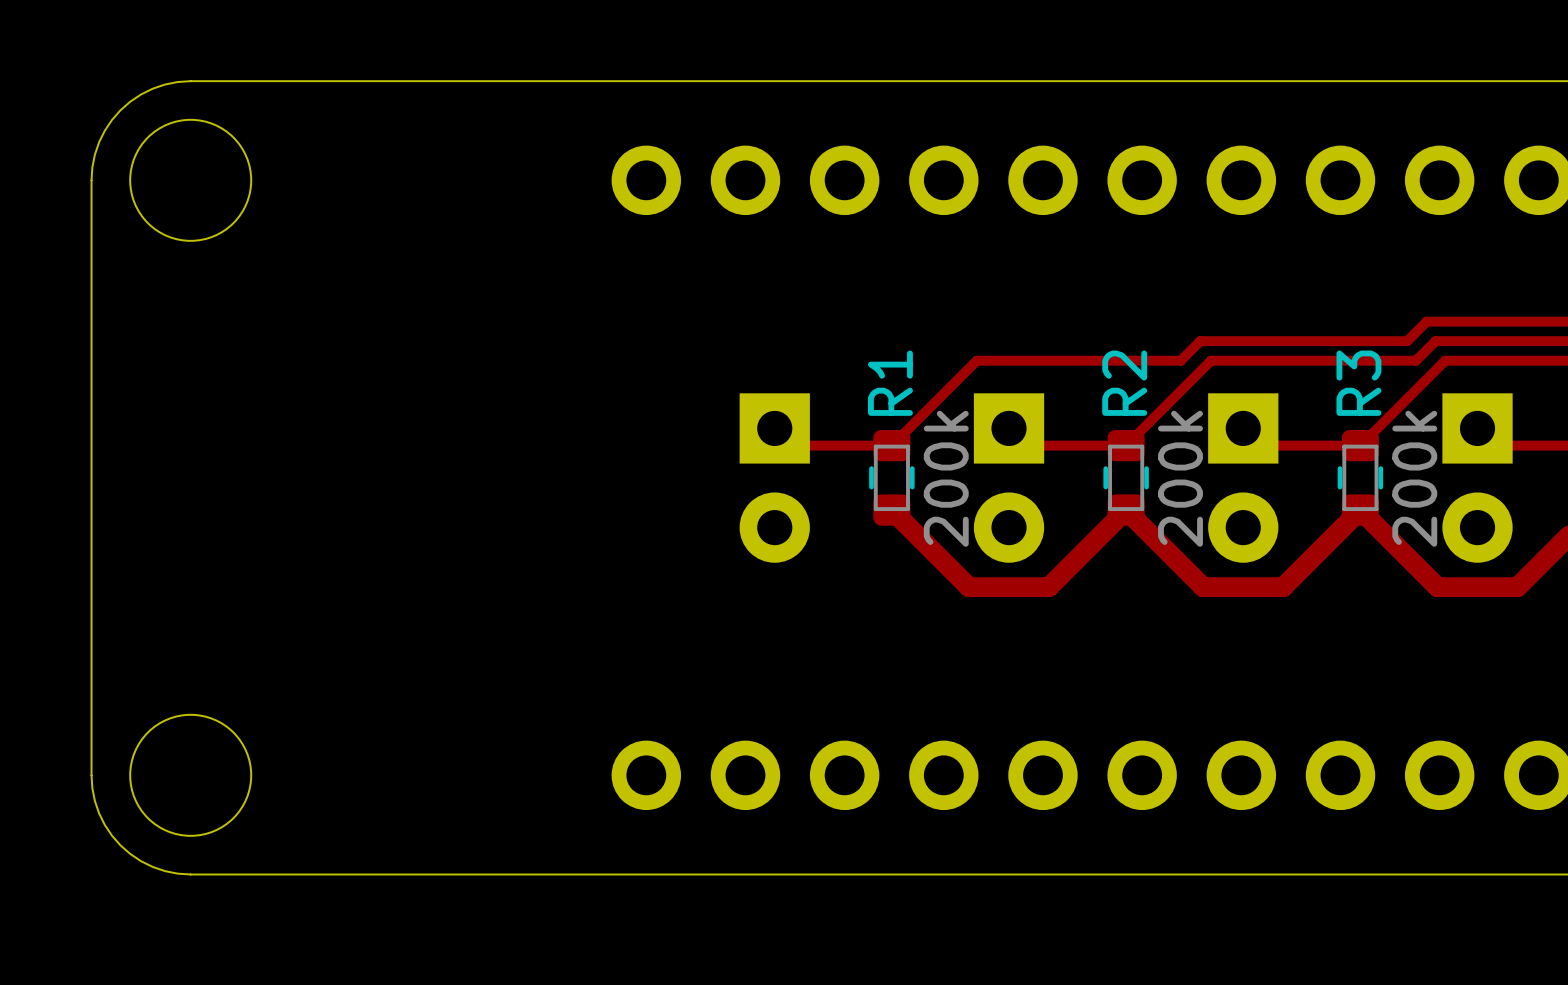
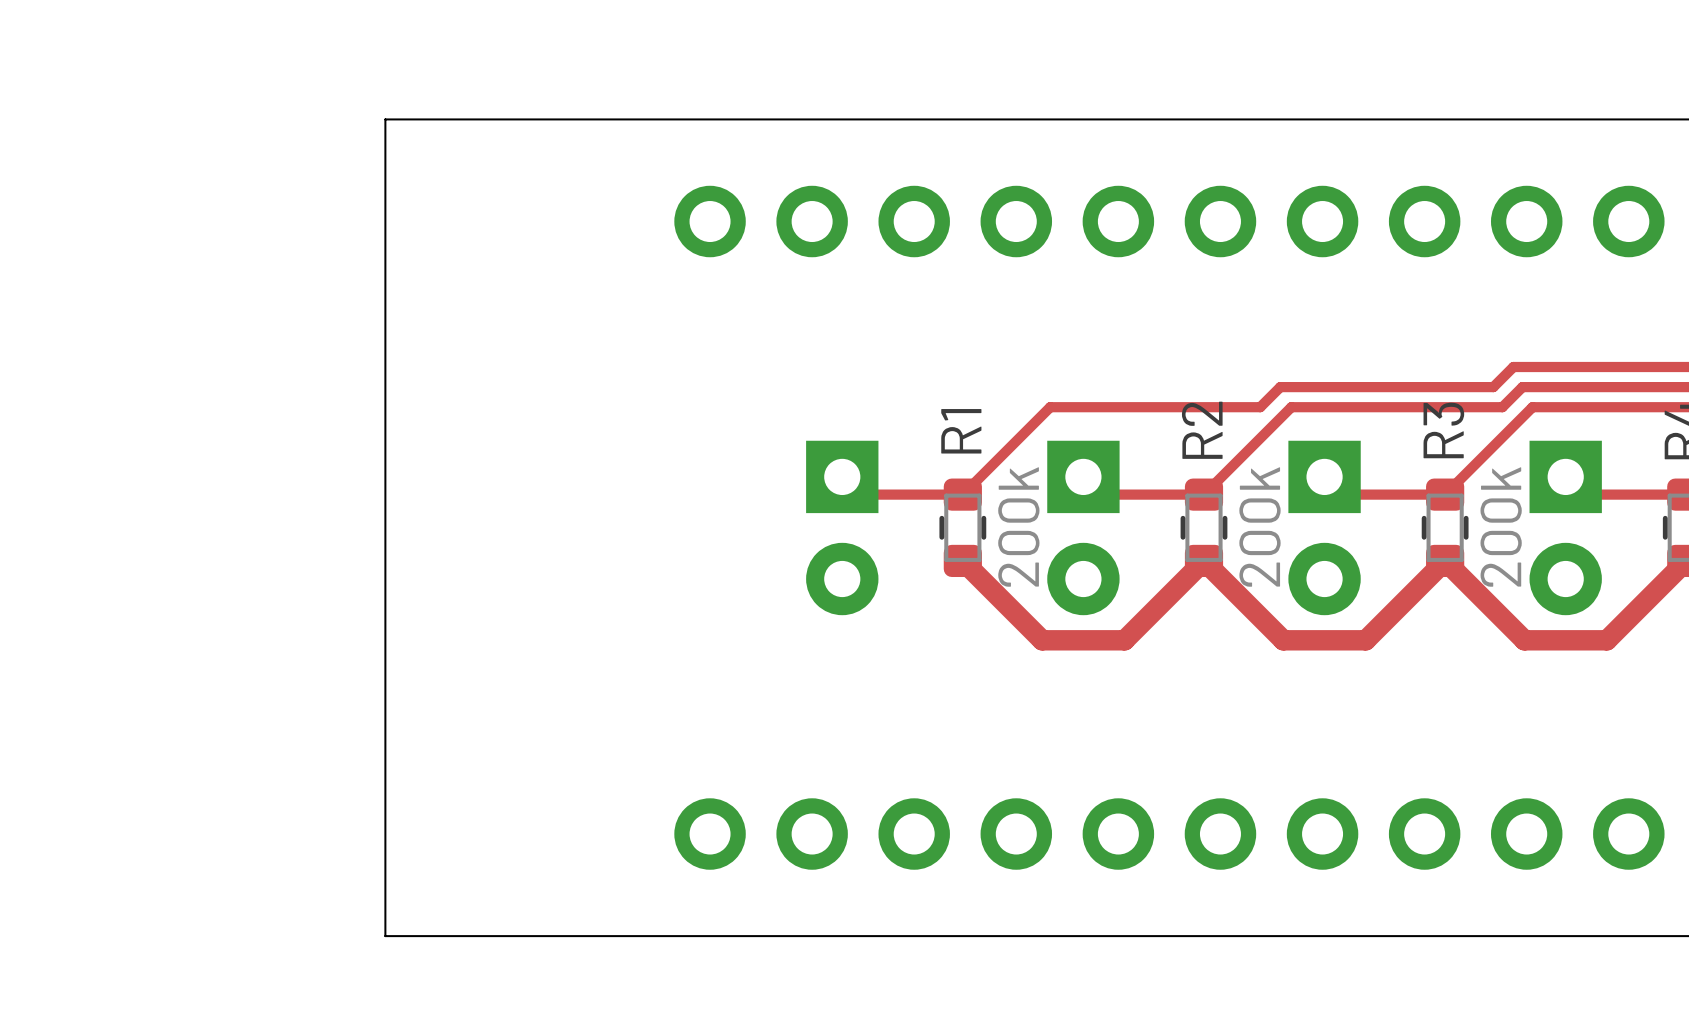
board edge: (330, 81) (190, 81) (165, 84) (152, 88) (130, 101) (120, 110) (104, 130) (94, 154) (91, 180) (91, 775) (92, 788) (99, 813) (104, 824) (120, 845) (141, 861) (165, 871) (190, 874) (330, 874) -> (385, 119) (385, 936)
round board edge: [129, 118, 253, 242] -> none
round board edge: [129, 713, 253, 837] -> none

